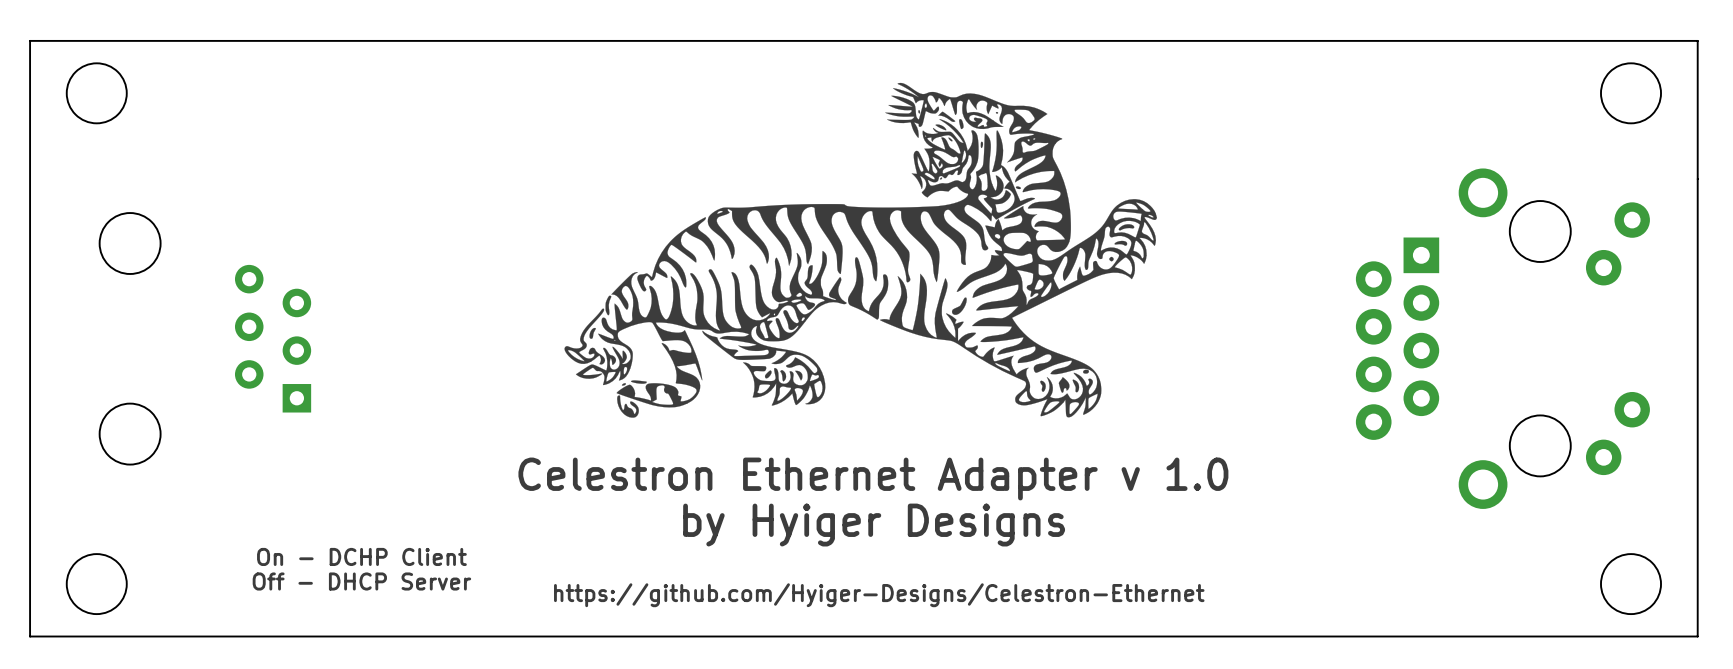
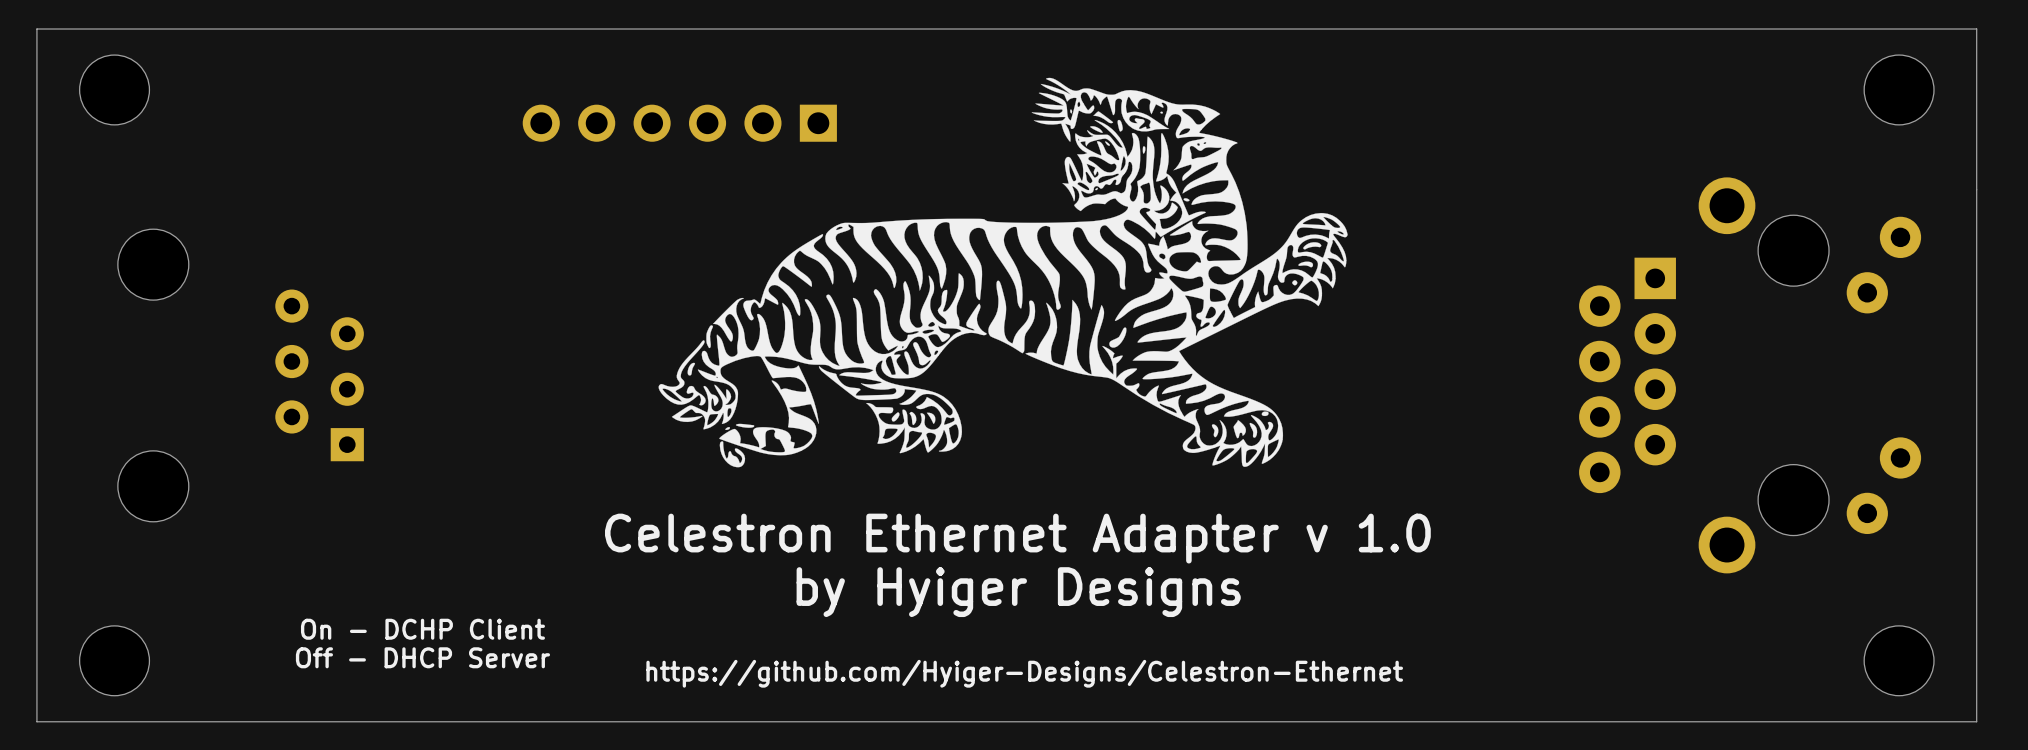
part: none -> (679, 123)

